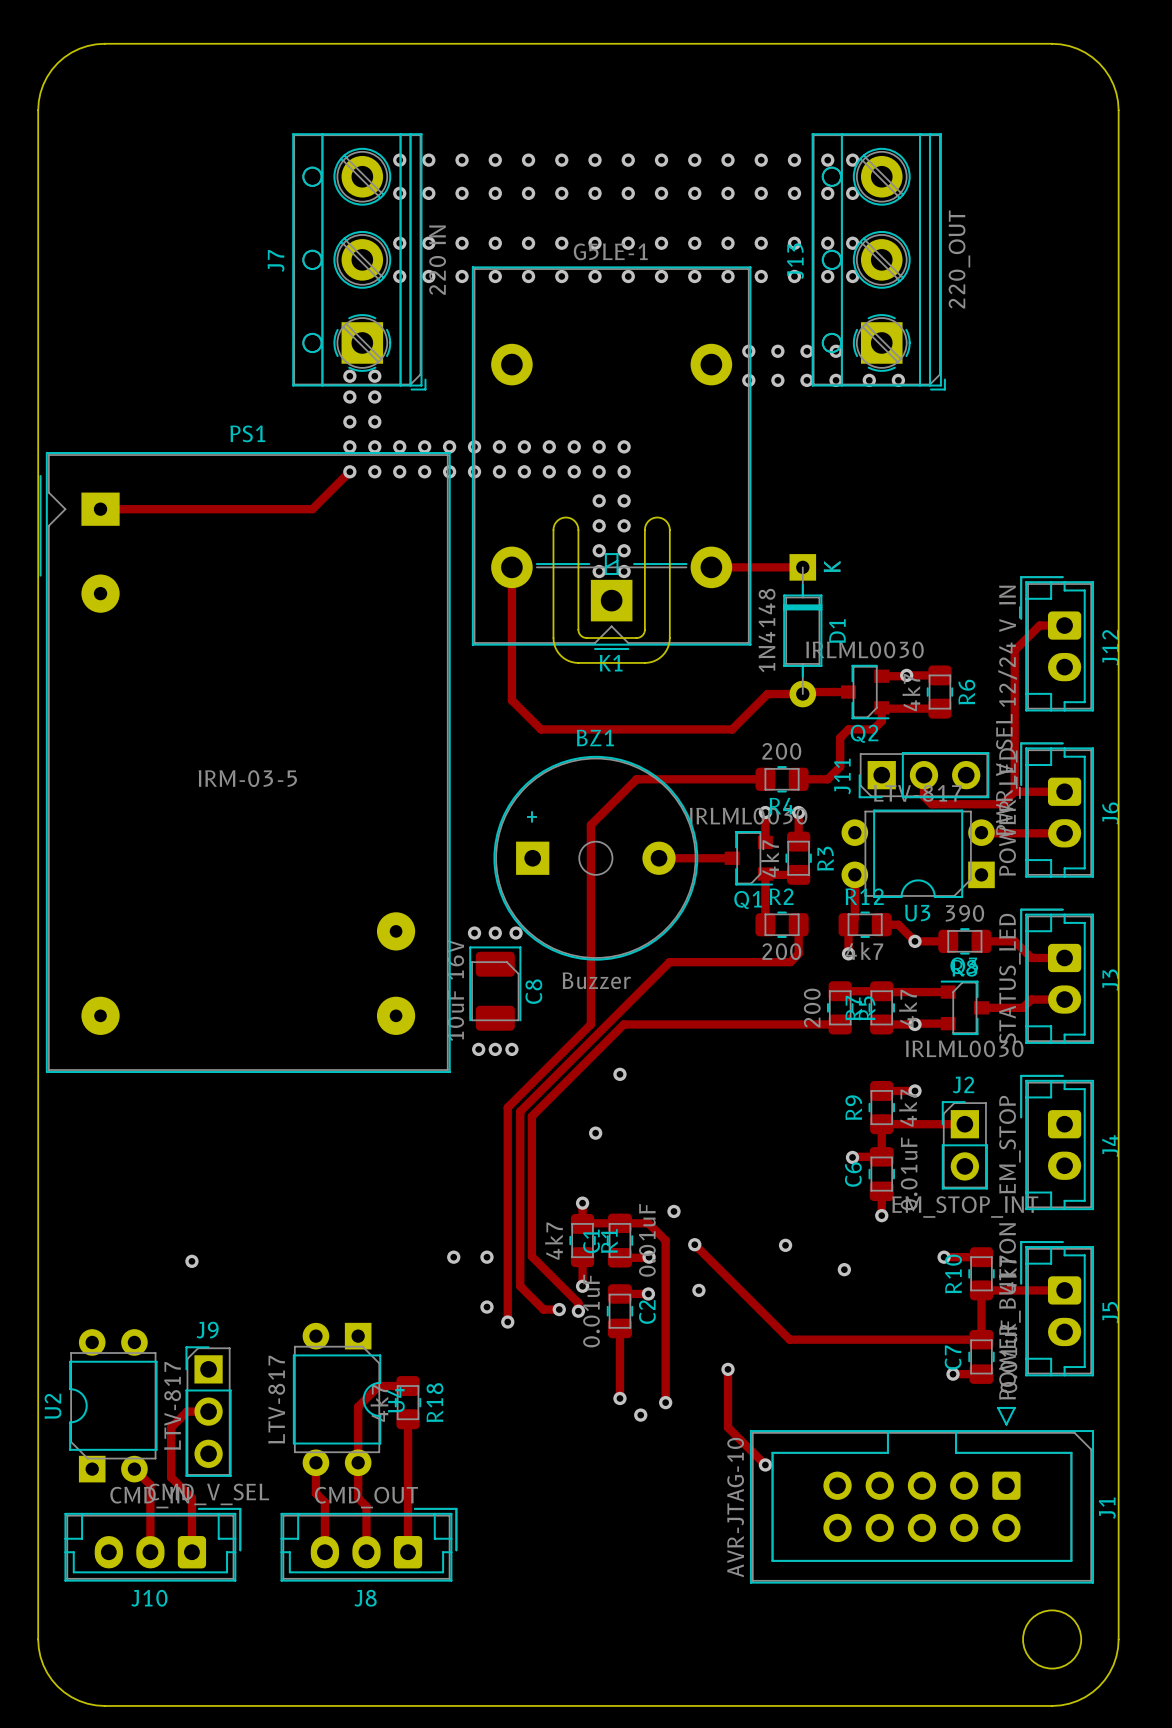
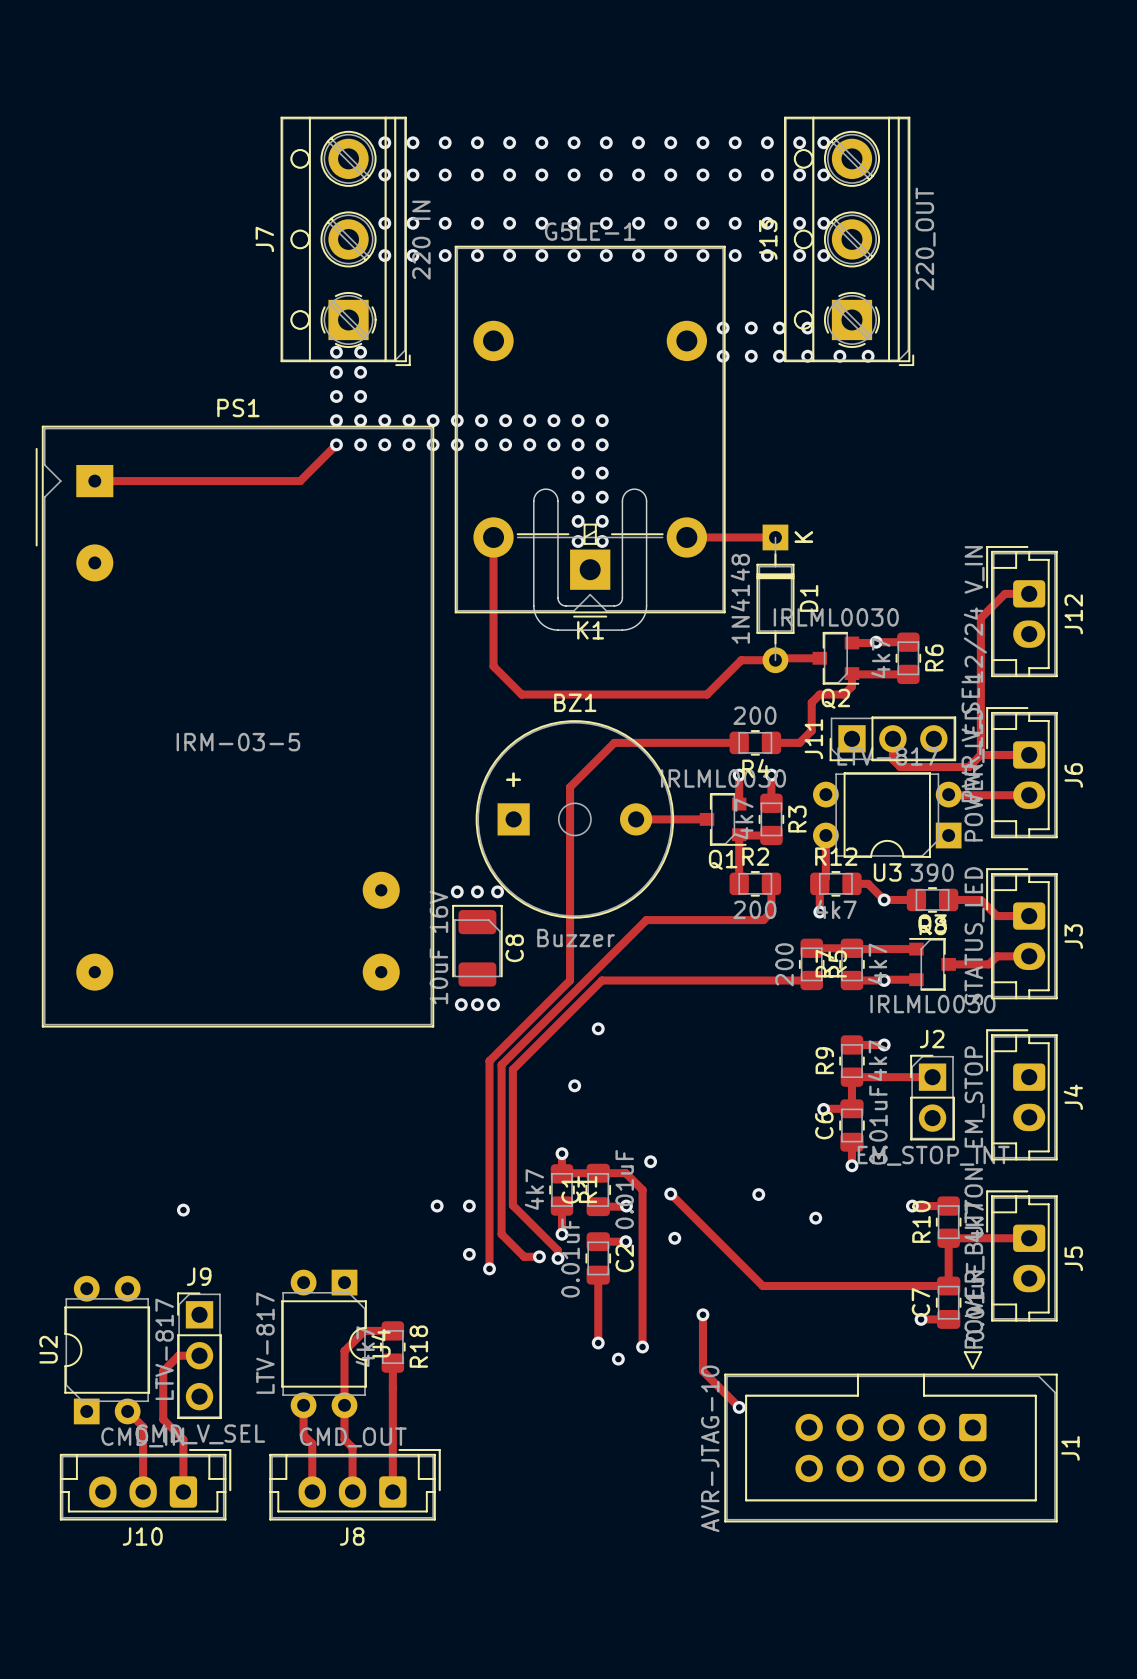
board edge: (104, 43) (1052, 43) (1069, 46) (1085, 52) (1099, 63) (1109, 77) (1116, 93) (1118, 110) (1118, 1639) (1116, 1656) (1109, 1672) (1099, 1686) (1085, 1697) (1069, 1703) (1052, 1705) (104, 1705) (87, 1703) (71, 1697) (57, 1686) (47, 1672) (40, 1656) (38, 1639) (38, 110) (43, 84) (57, 63) (79, 48) (104, 43) -> none
round board edge: [1022, 1609, 1082, 1669] -> none

